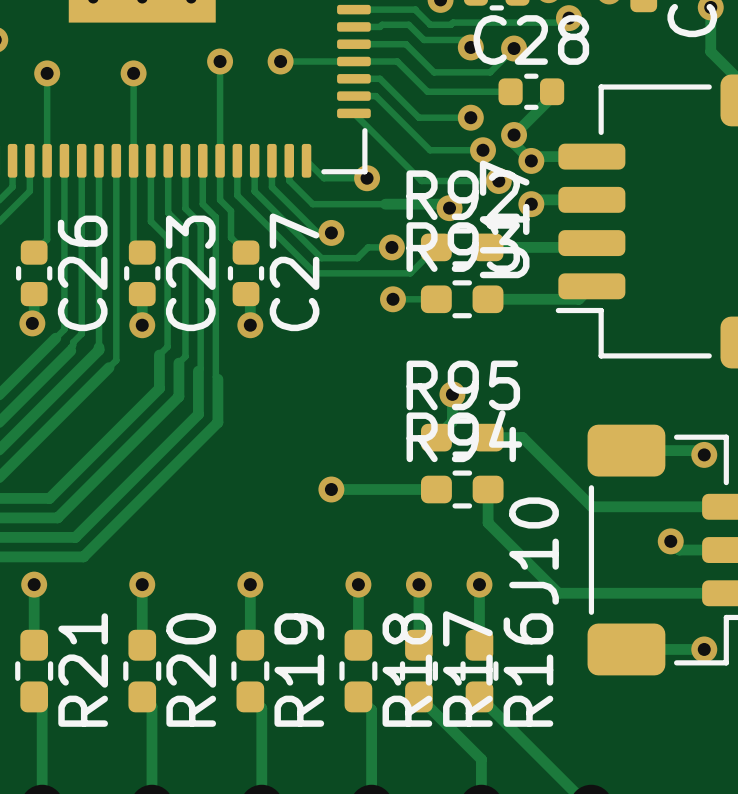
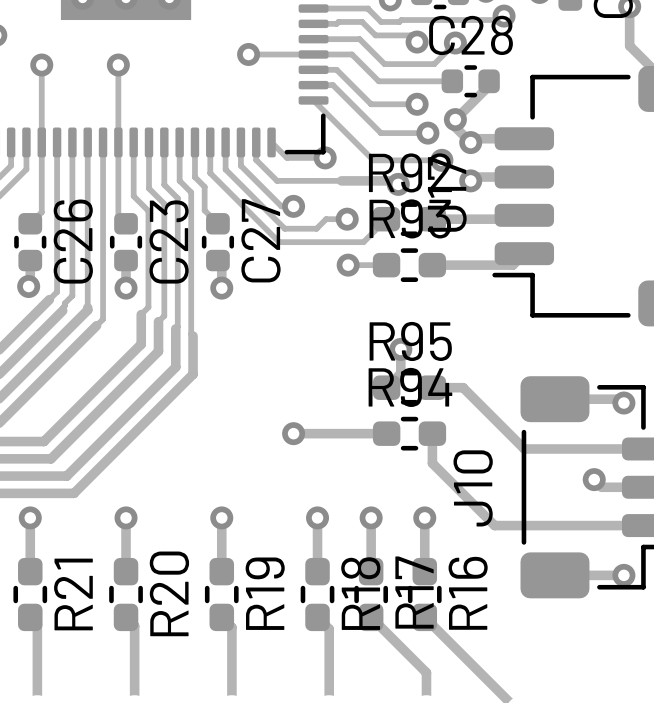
track: (220, 61) (220, 160) -> none
via: (220, 61) -> none

